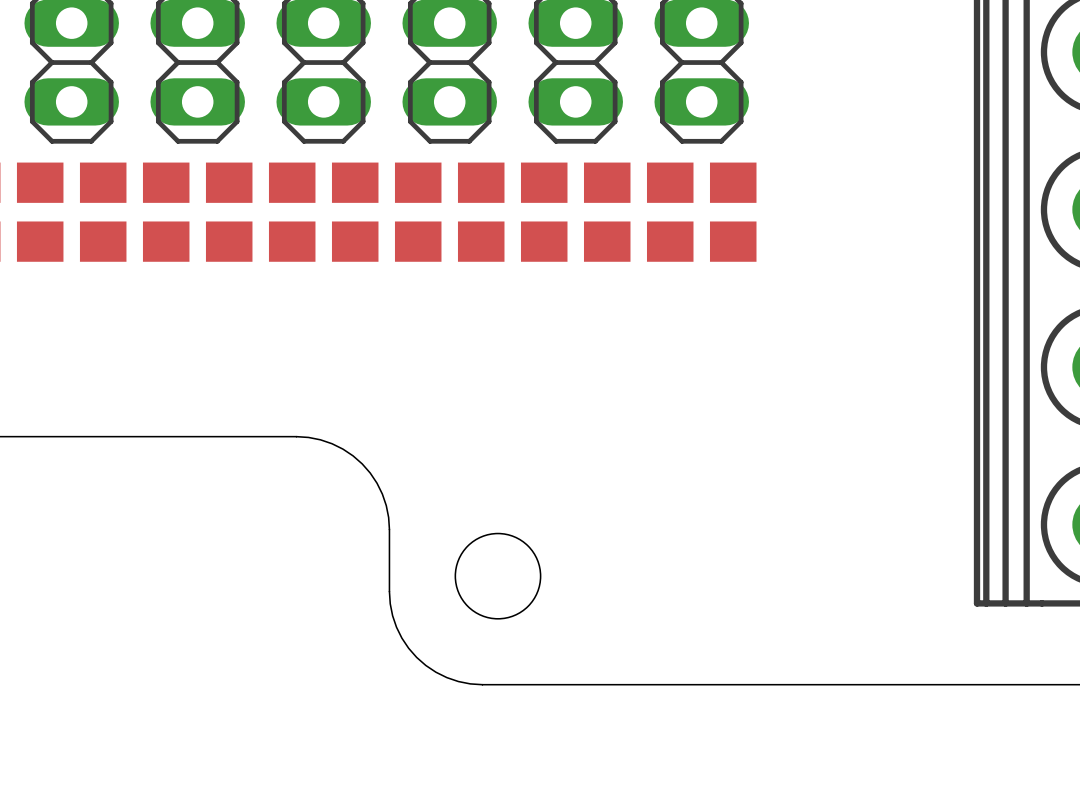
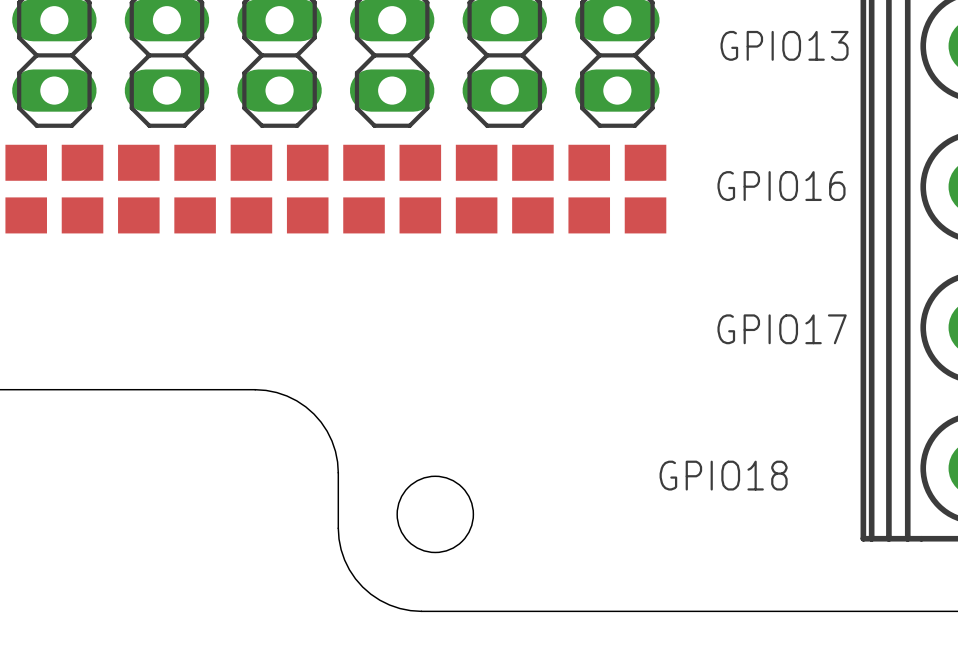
text: none -> GPIO13 (784, 45)
text: none -> GPIO16 (781, 186)
text: none -> GPIO17 (782, 329)
text: none -> GPIO18 (723, 475)

